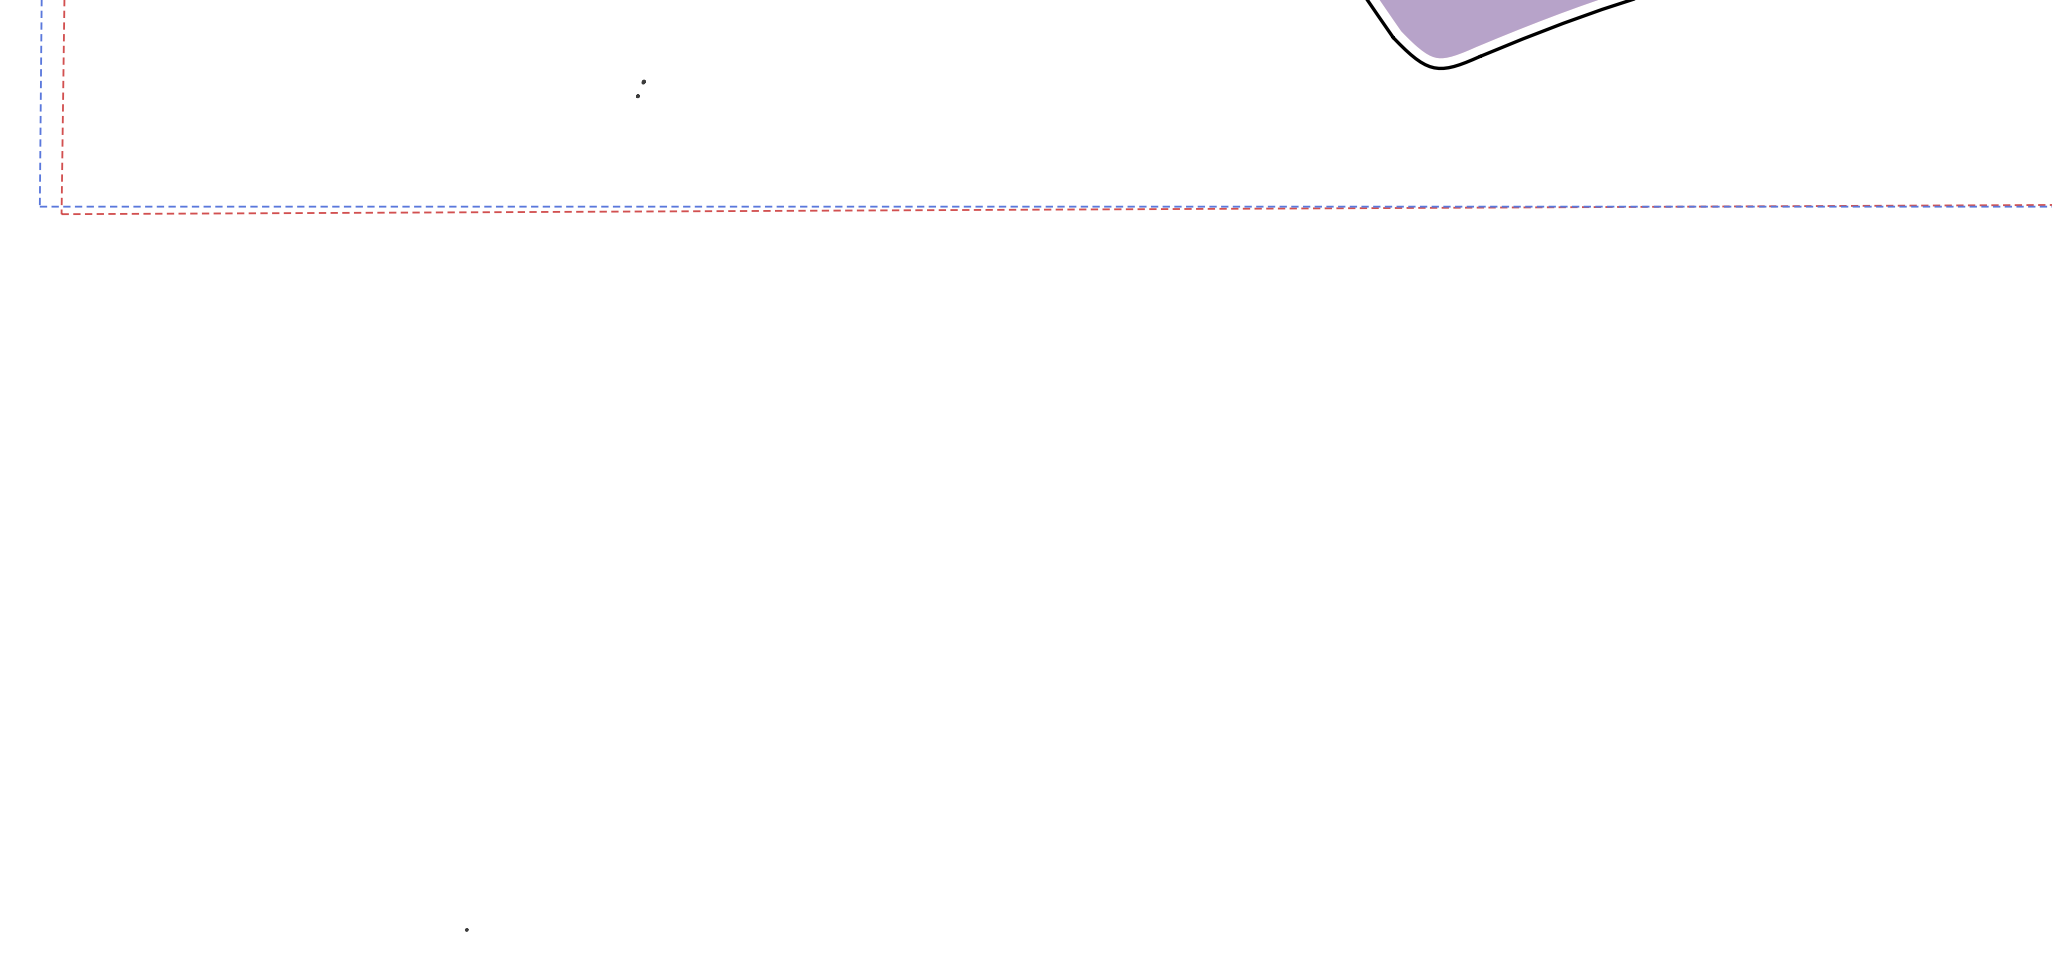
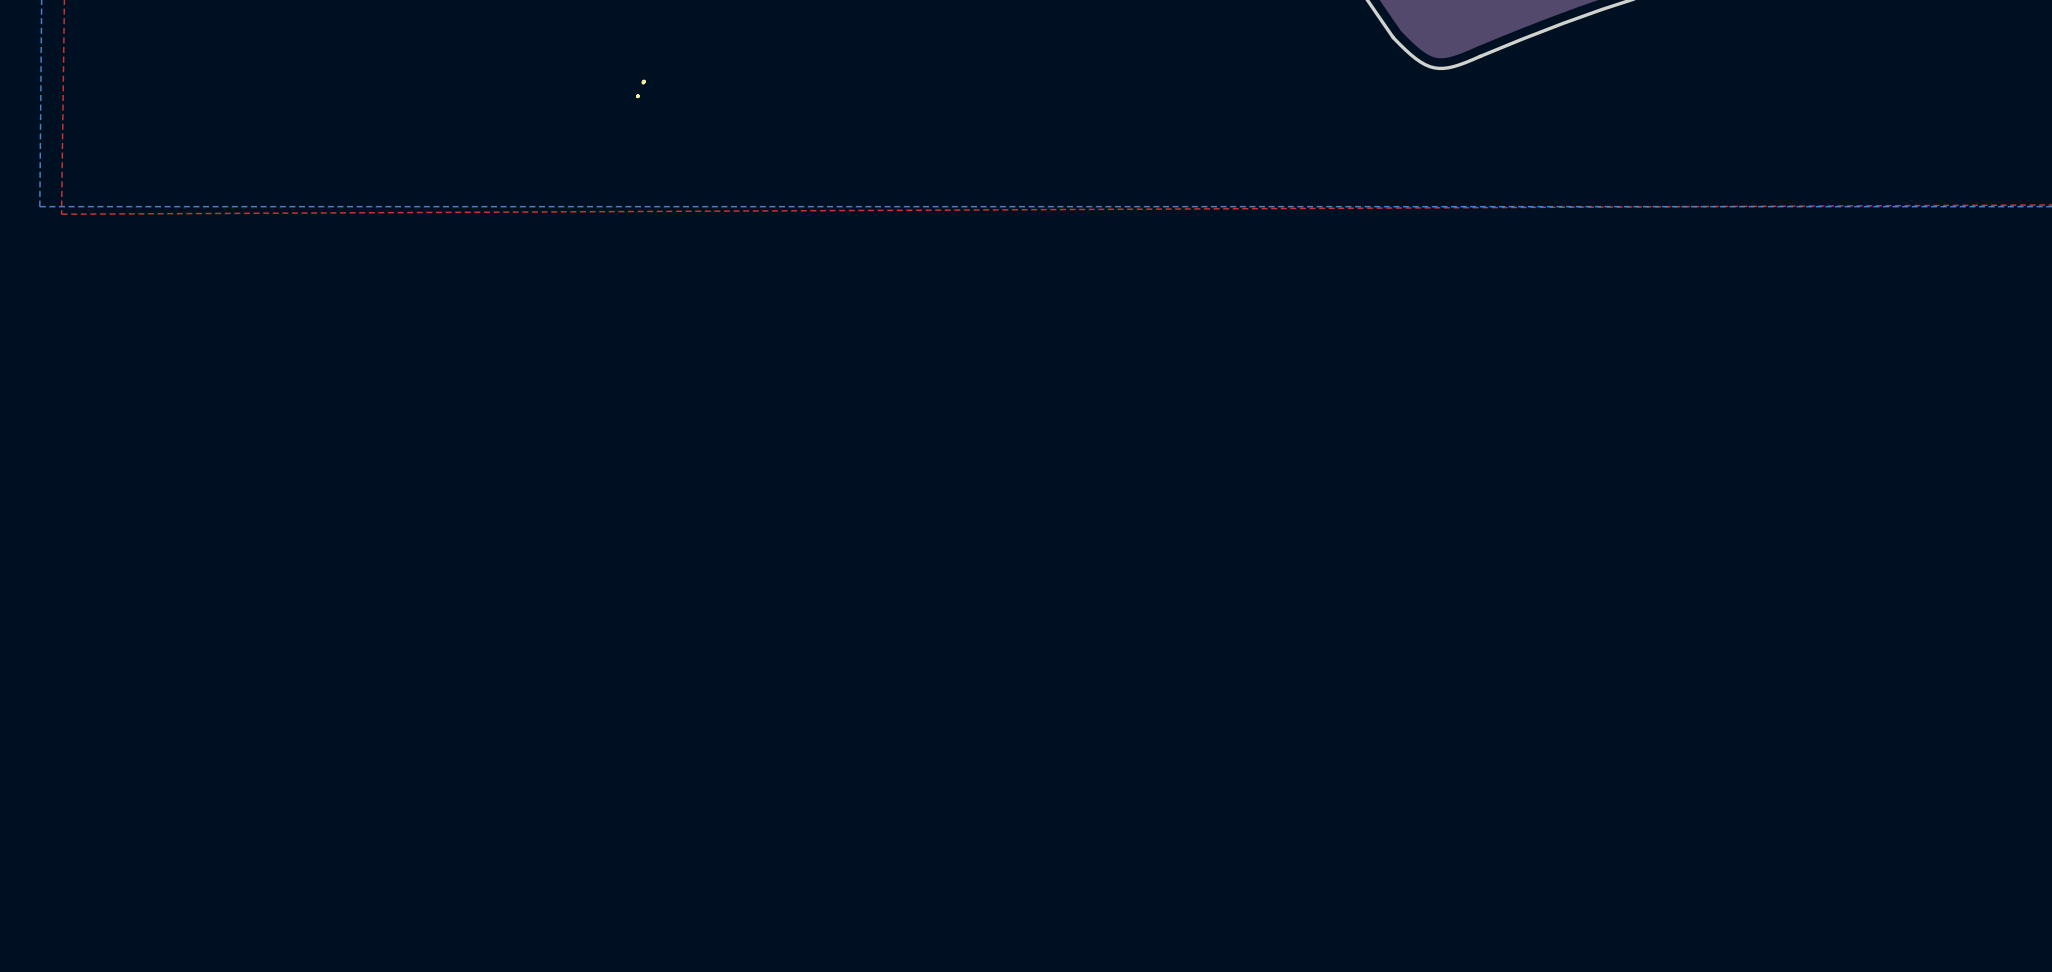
line: (466, 929) (466, 930) (466, 930) (466, 929) (466, 929) -> none

